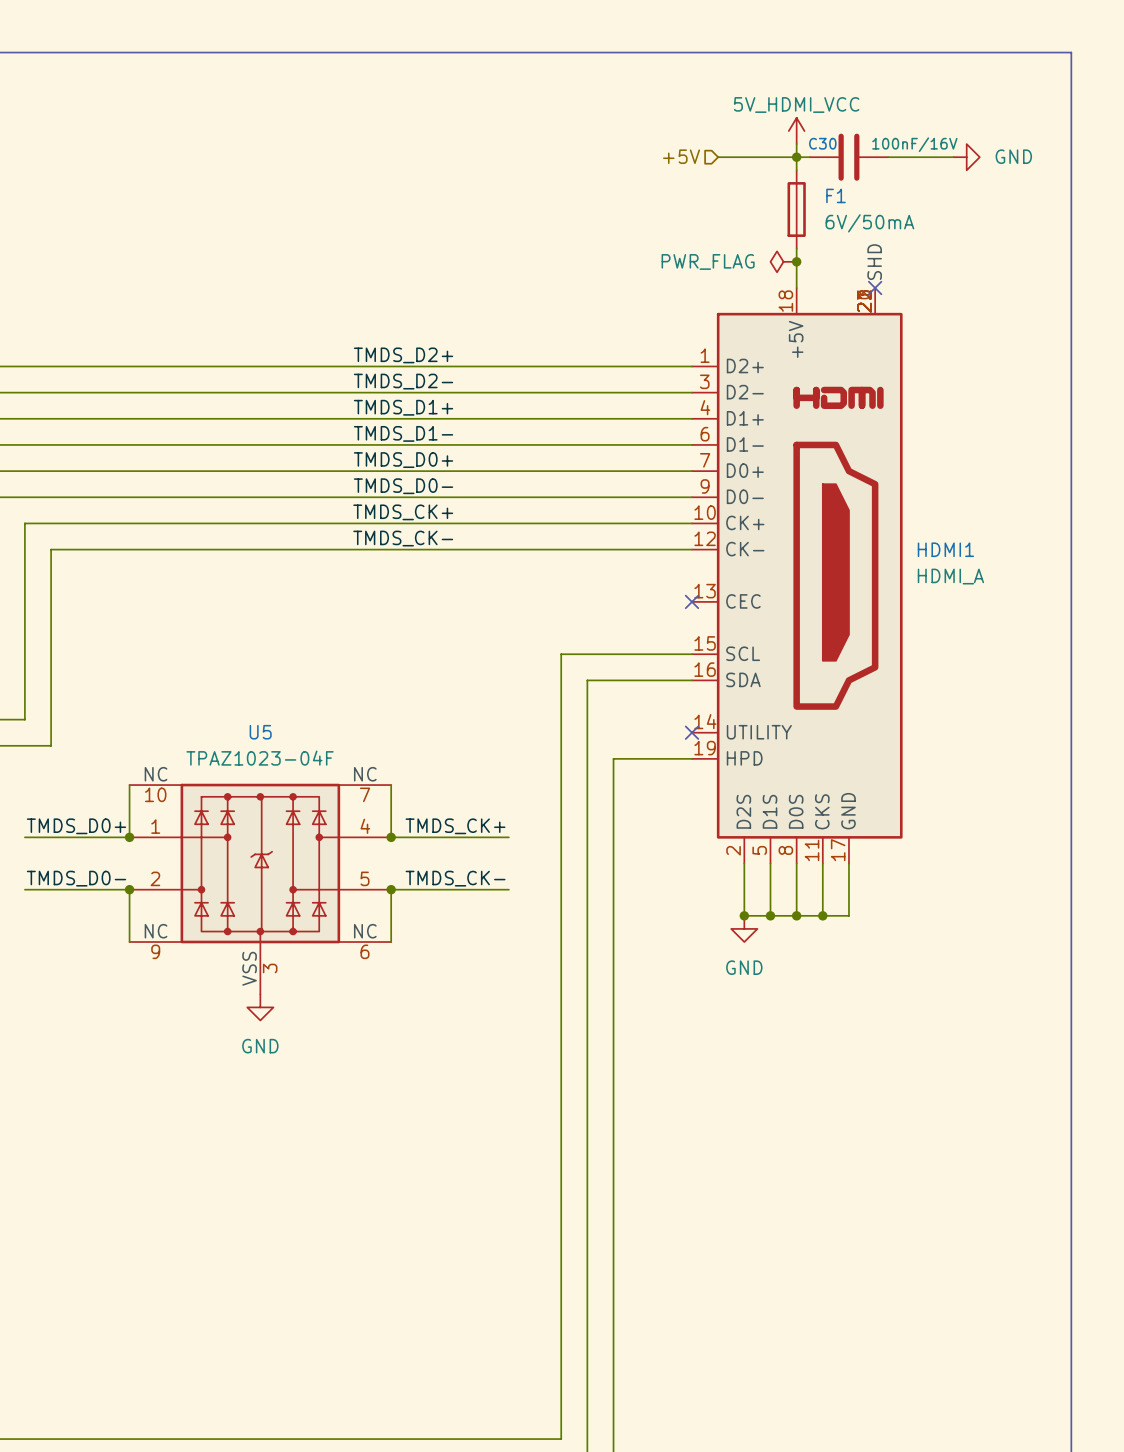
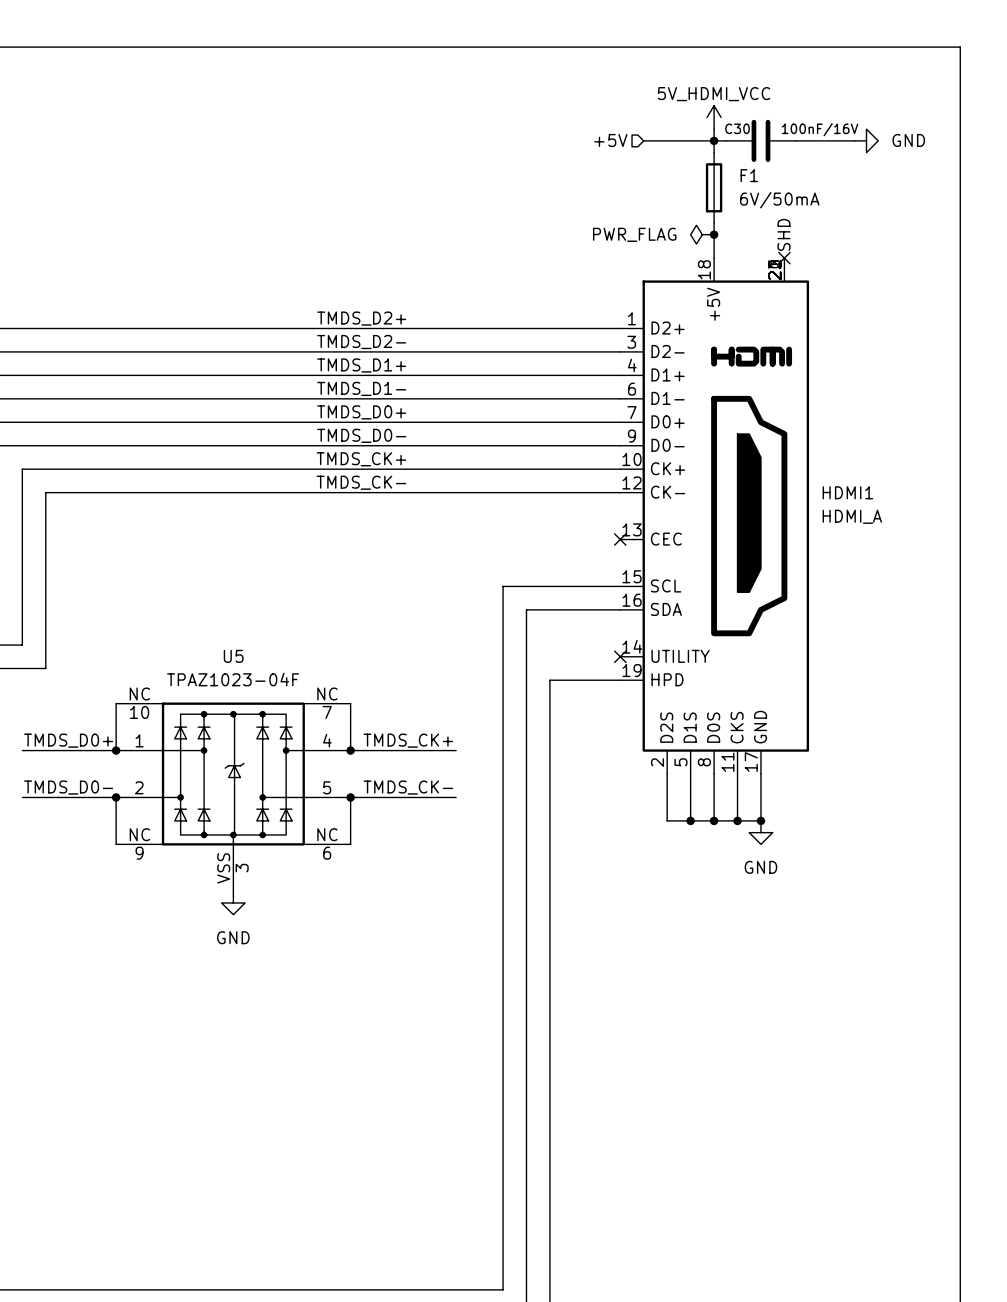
junction: (744, 915) -> none
junction: none -> (760, 820)
power symbol position: GND (744, 928) -> GND (760, 832)

